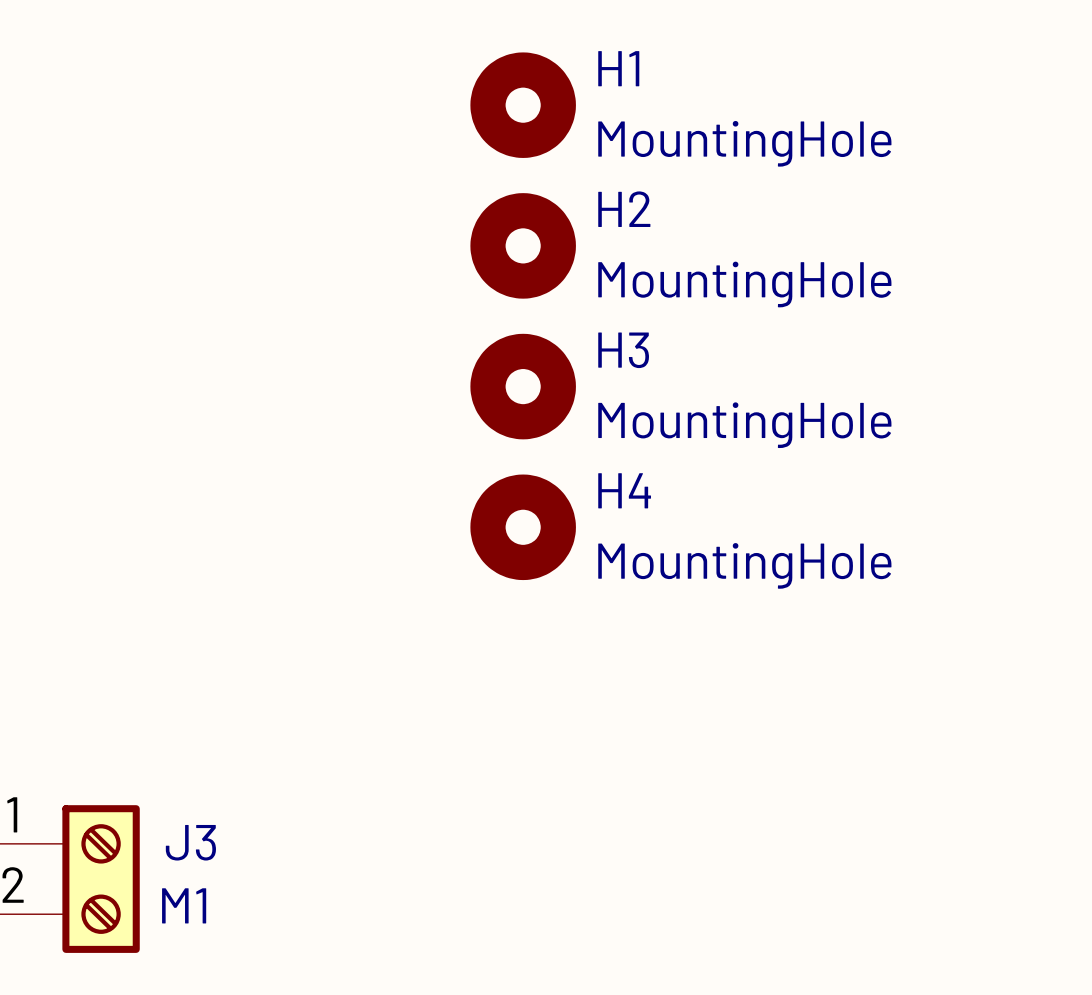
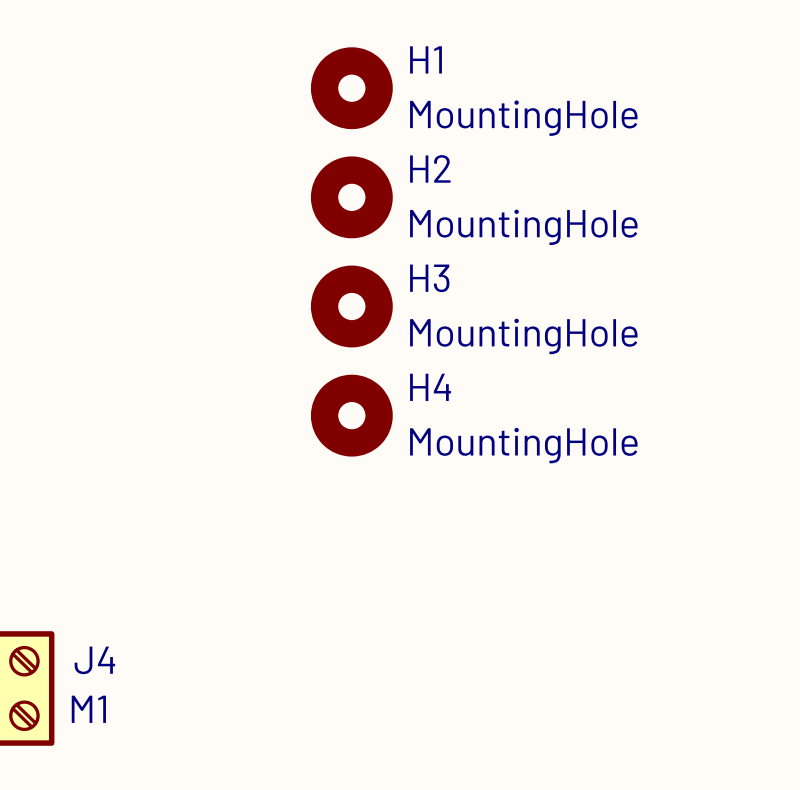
J3 name: J3 (190, 842) -> J4 (94, 660)

